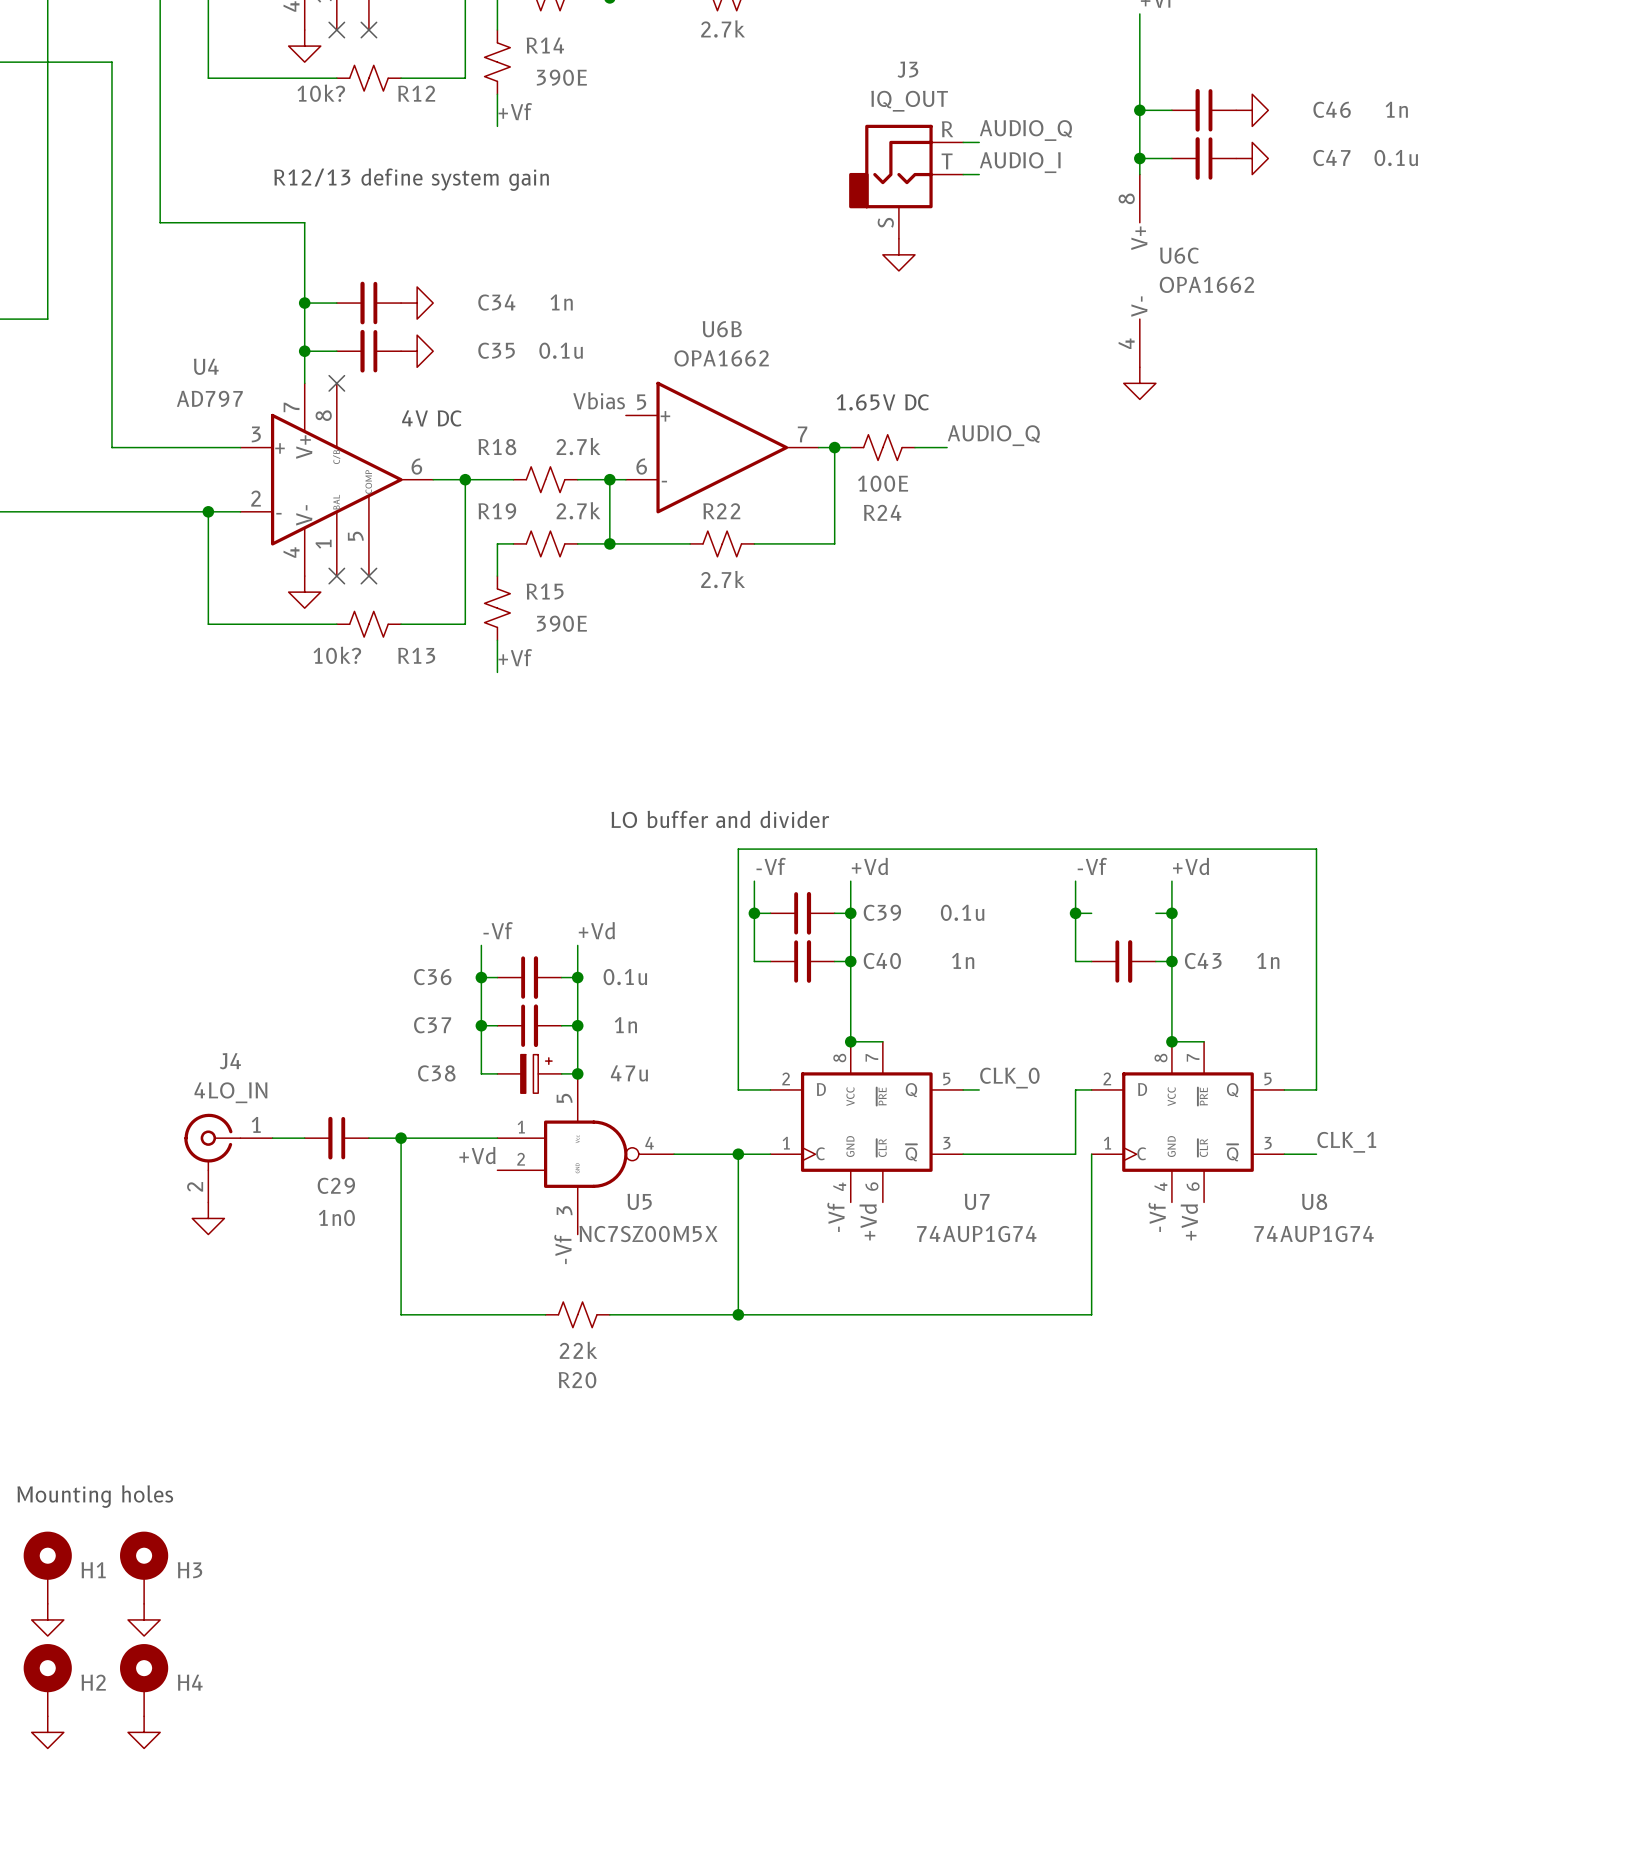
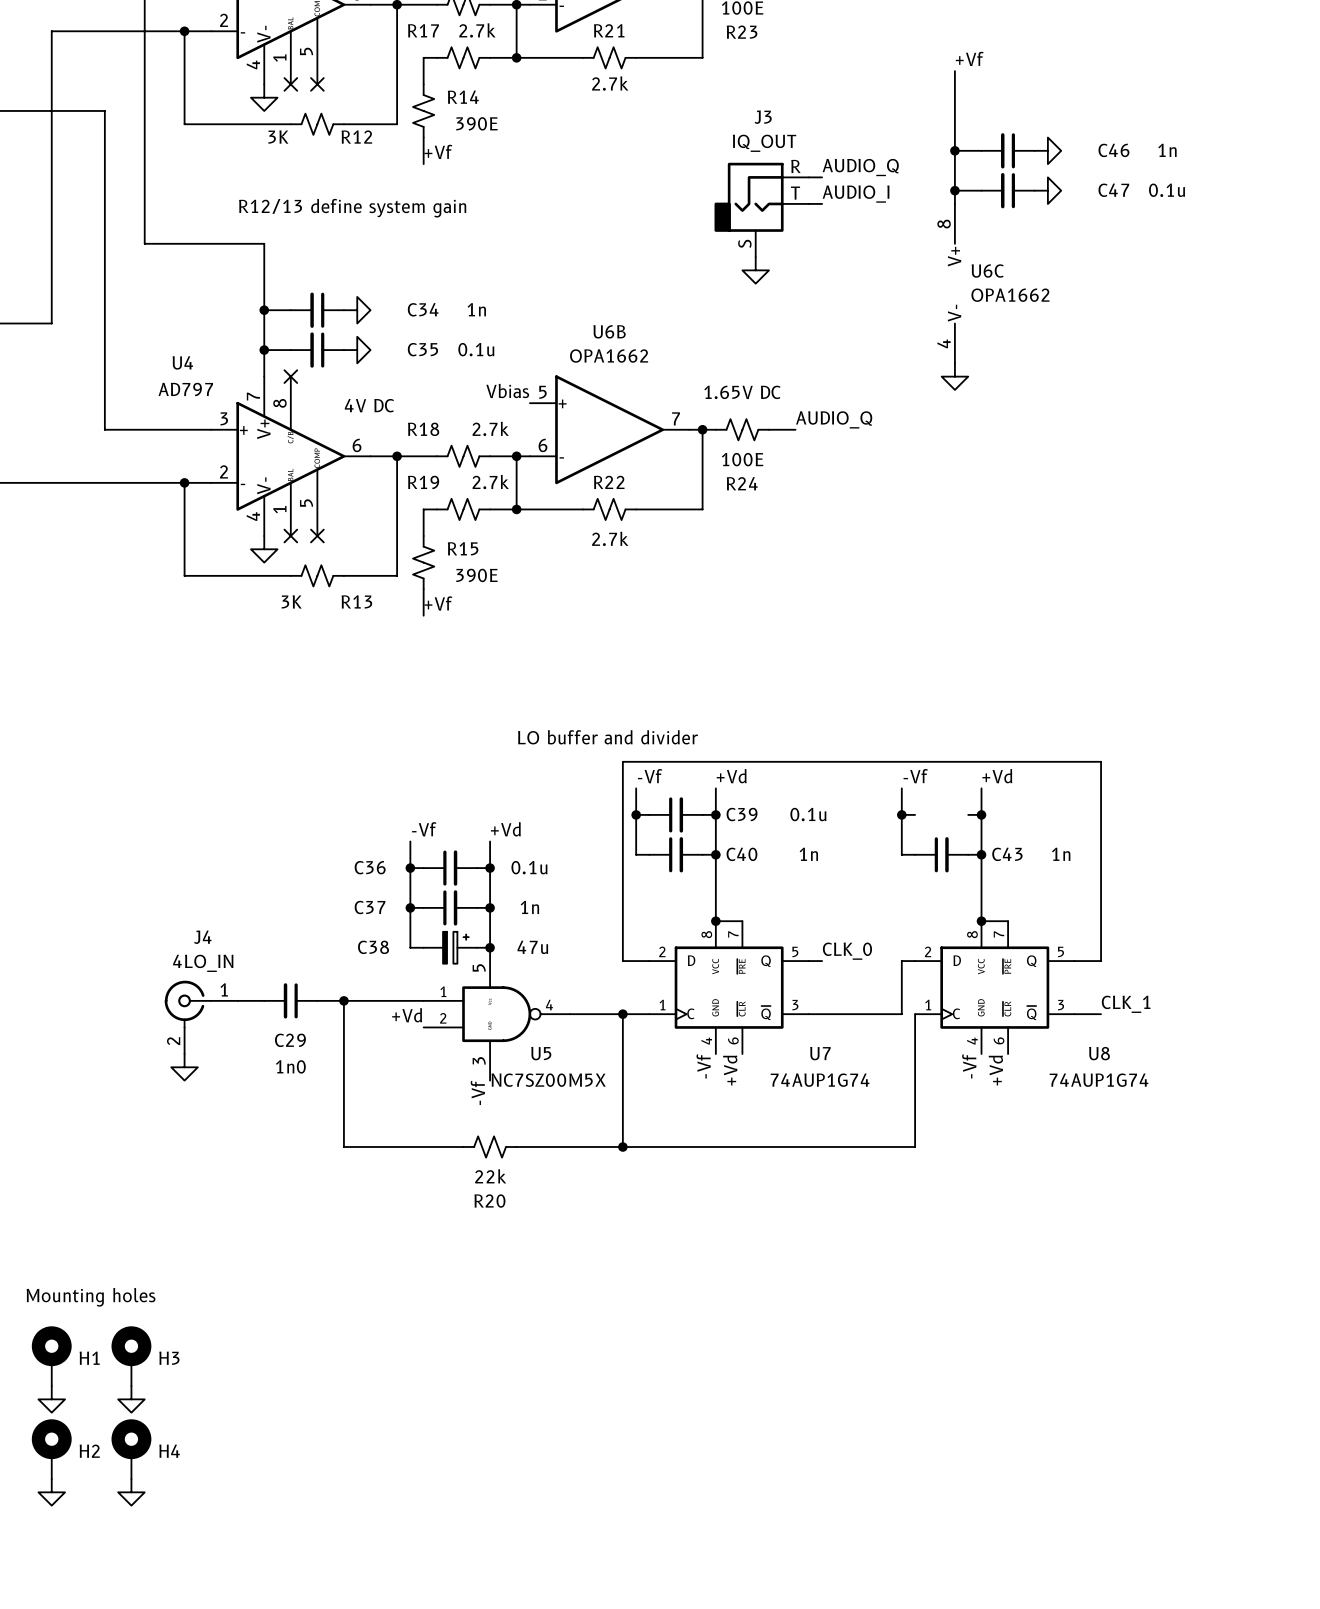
R12 value: 10k? (321, 93) -> 3K (278, 137)
R13 value: 10k? (337, 655) -> 3K (291, 601)

